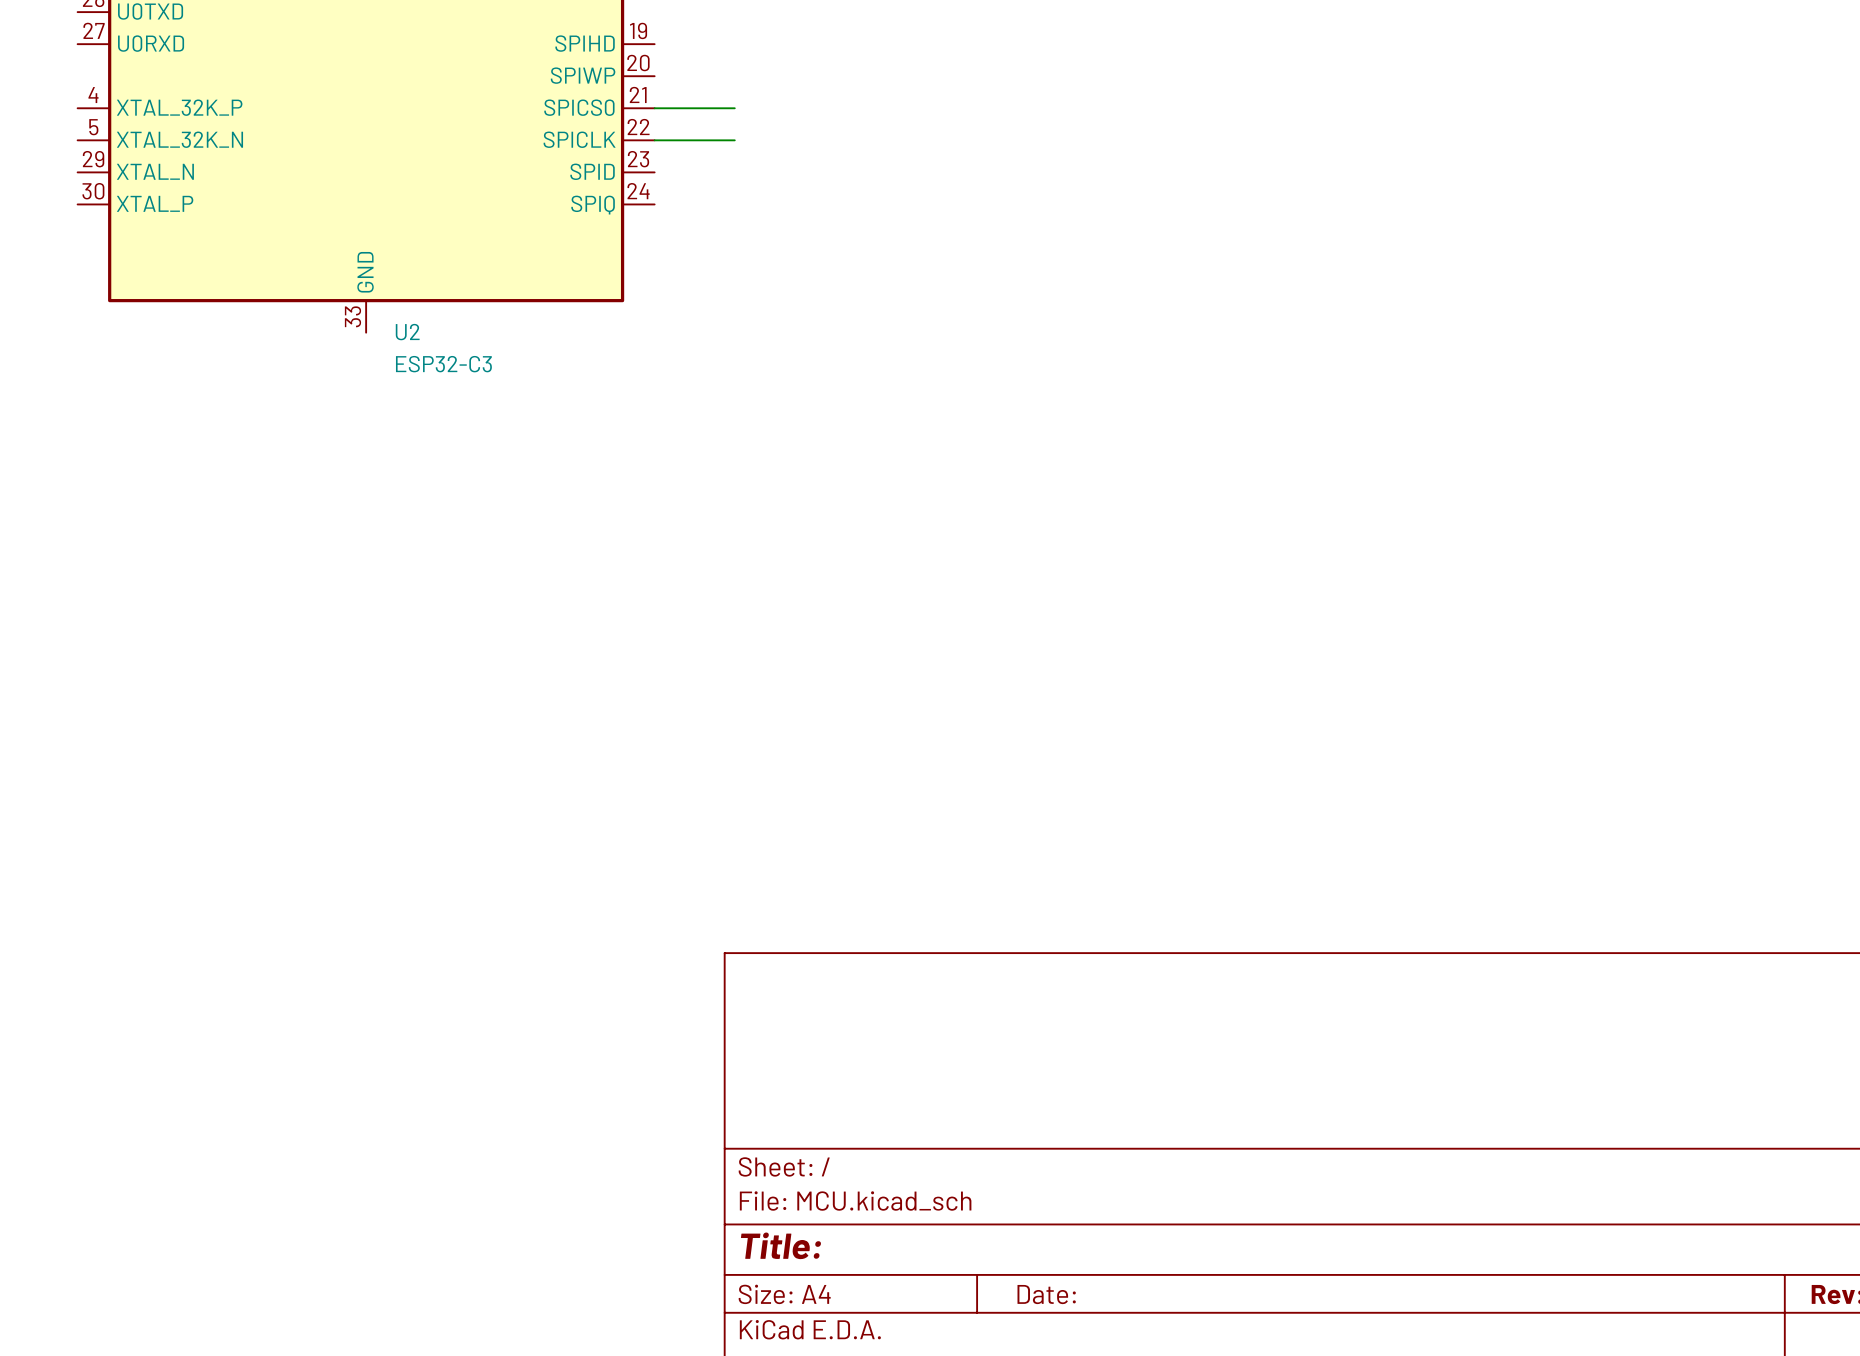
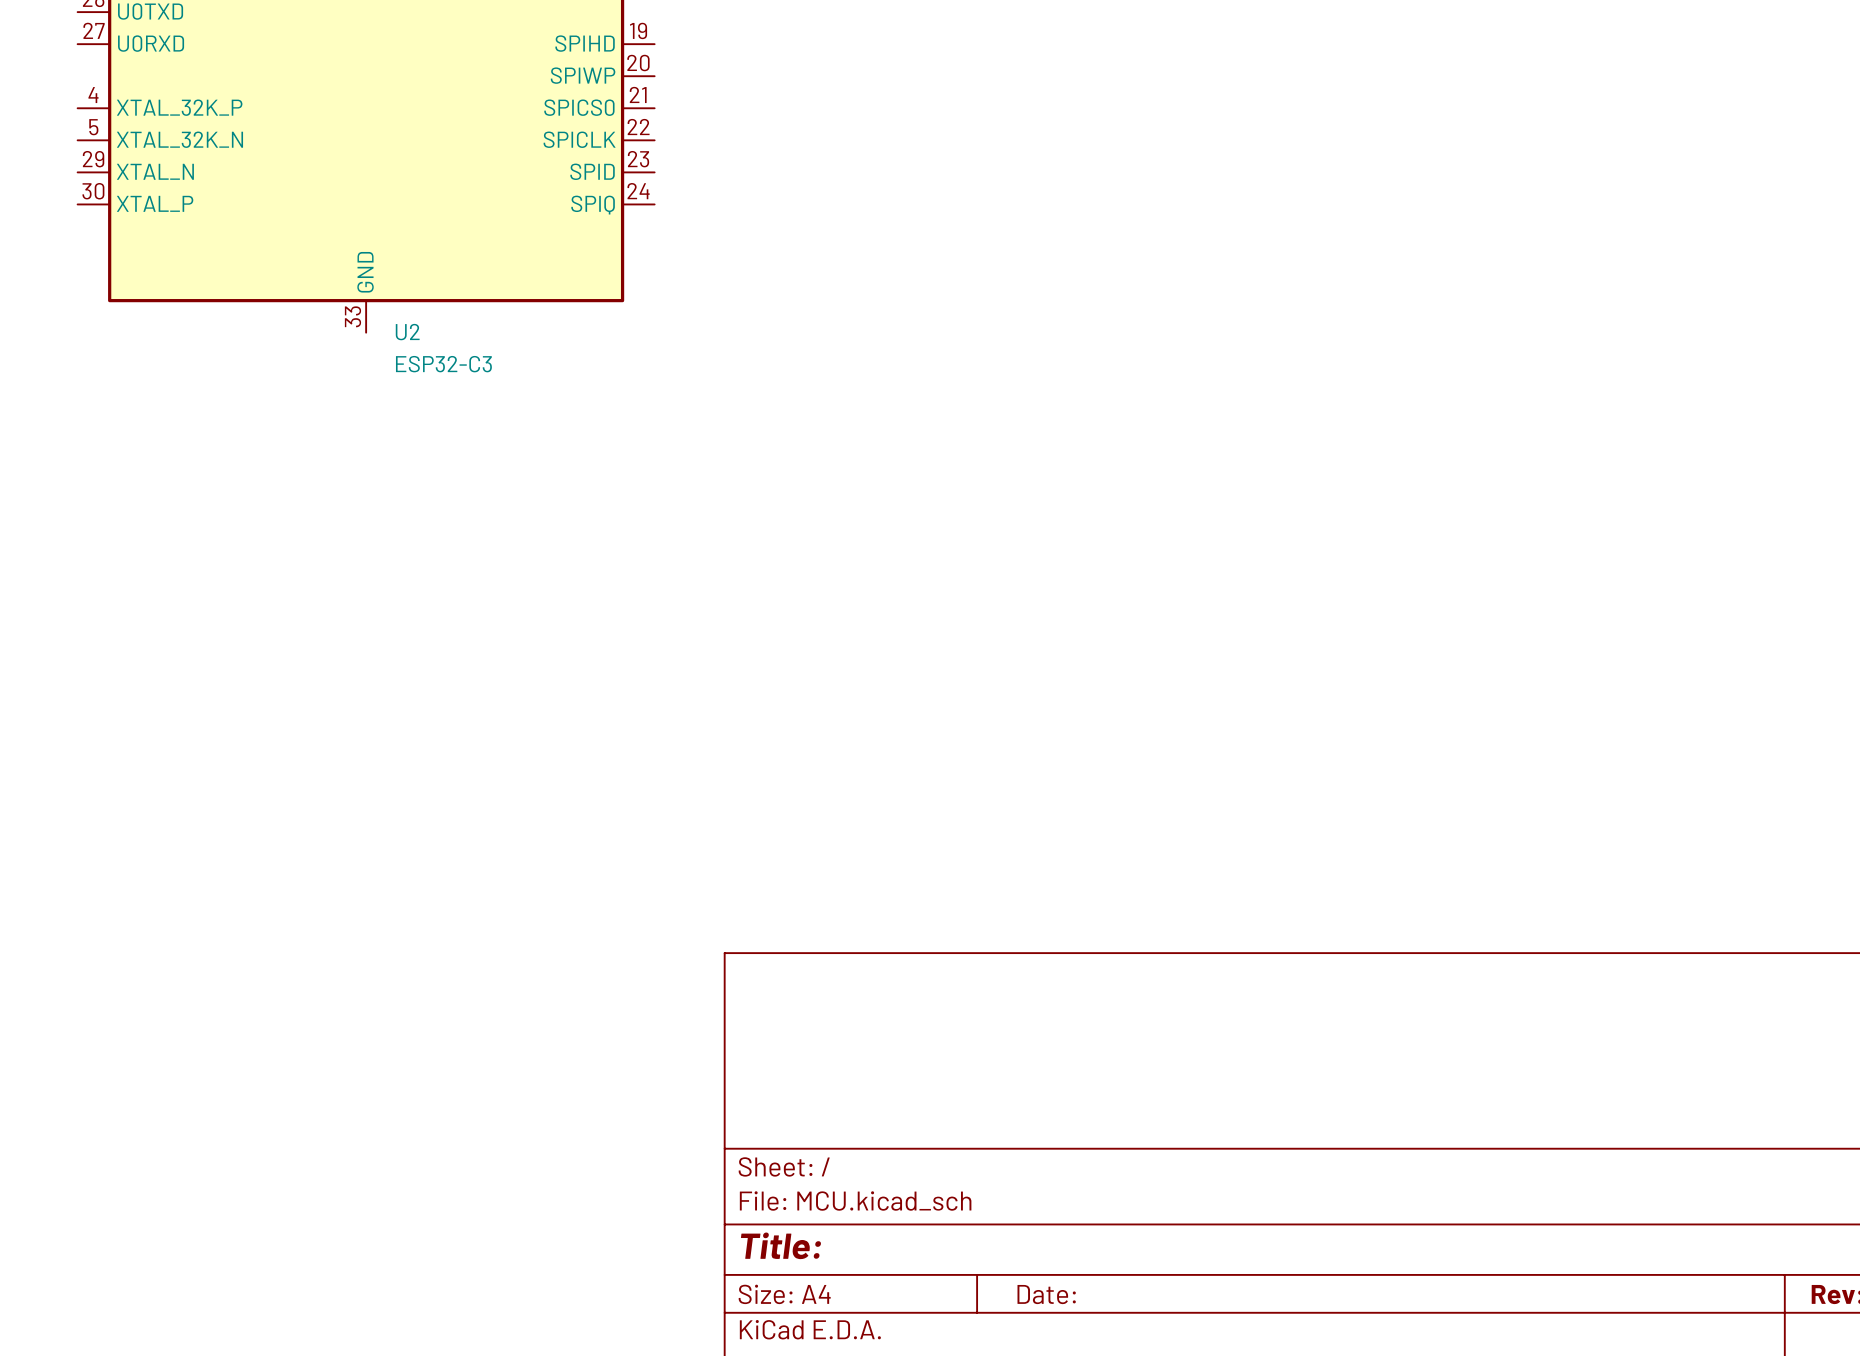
wire: (654, 108) (734, 108) -> none
wire: (654, 140) (734, 140) -> none

